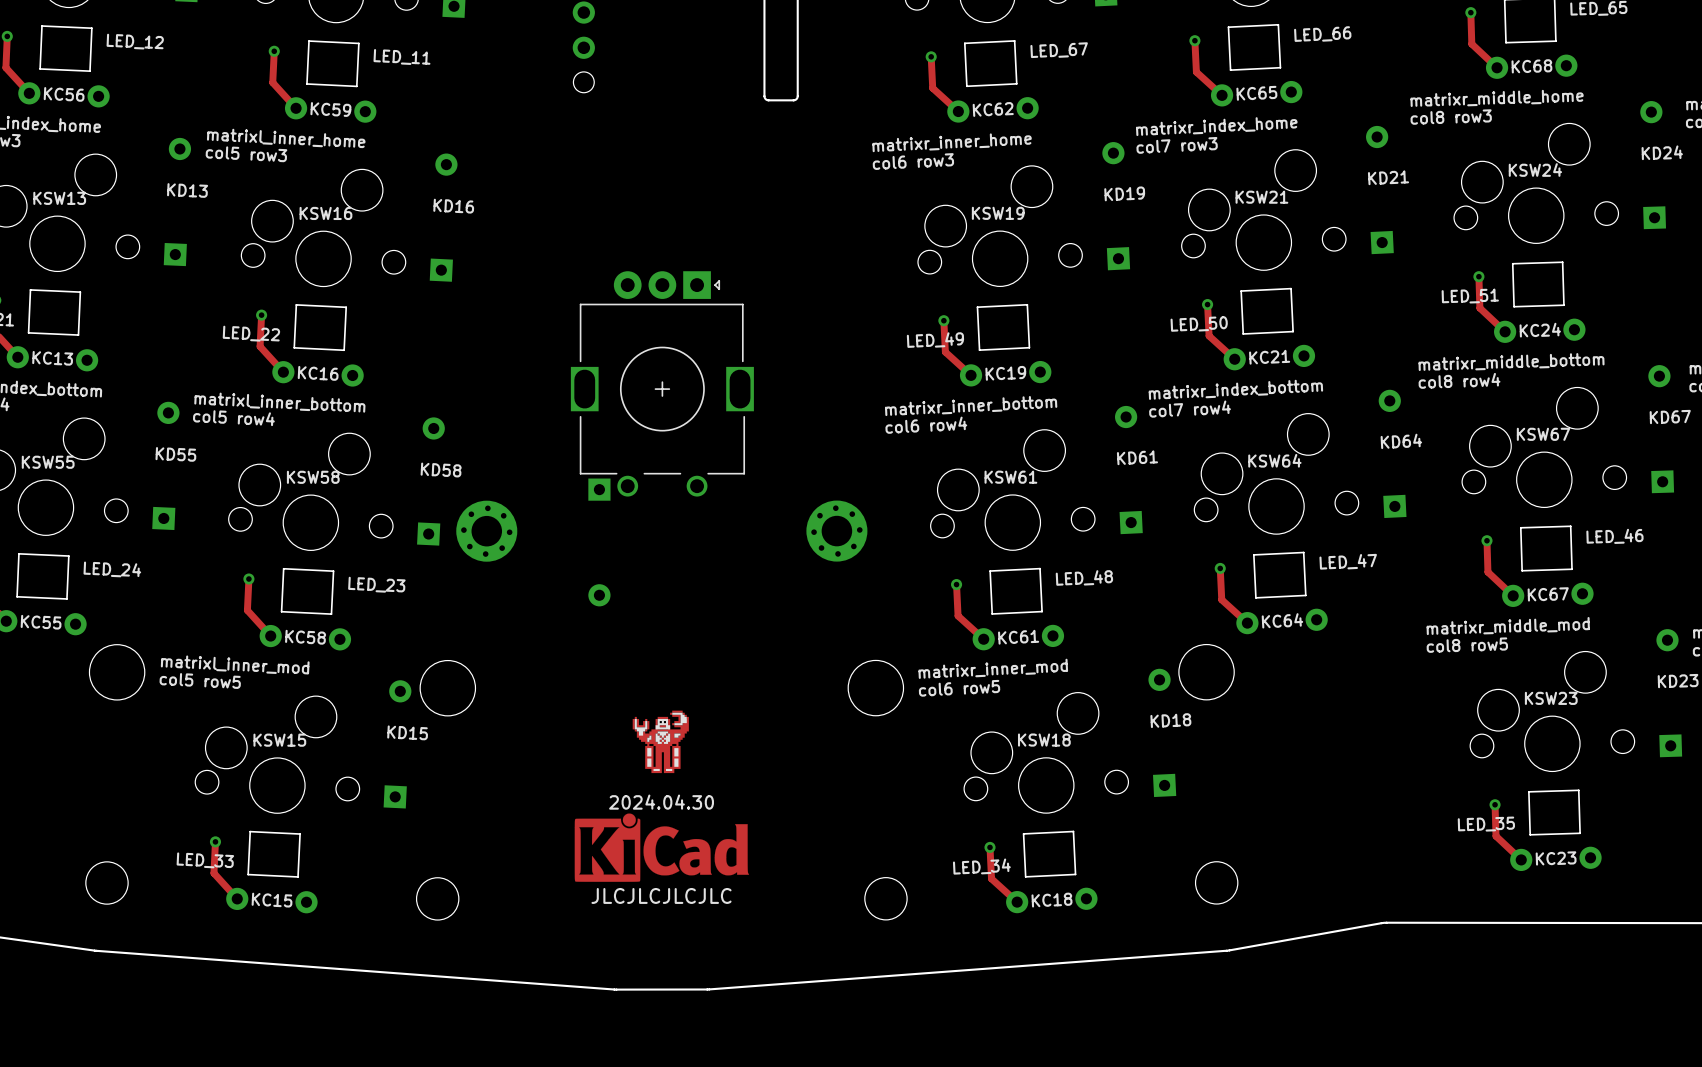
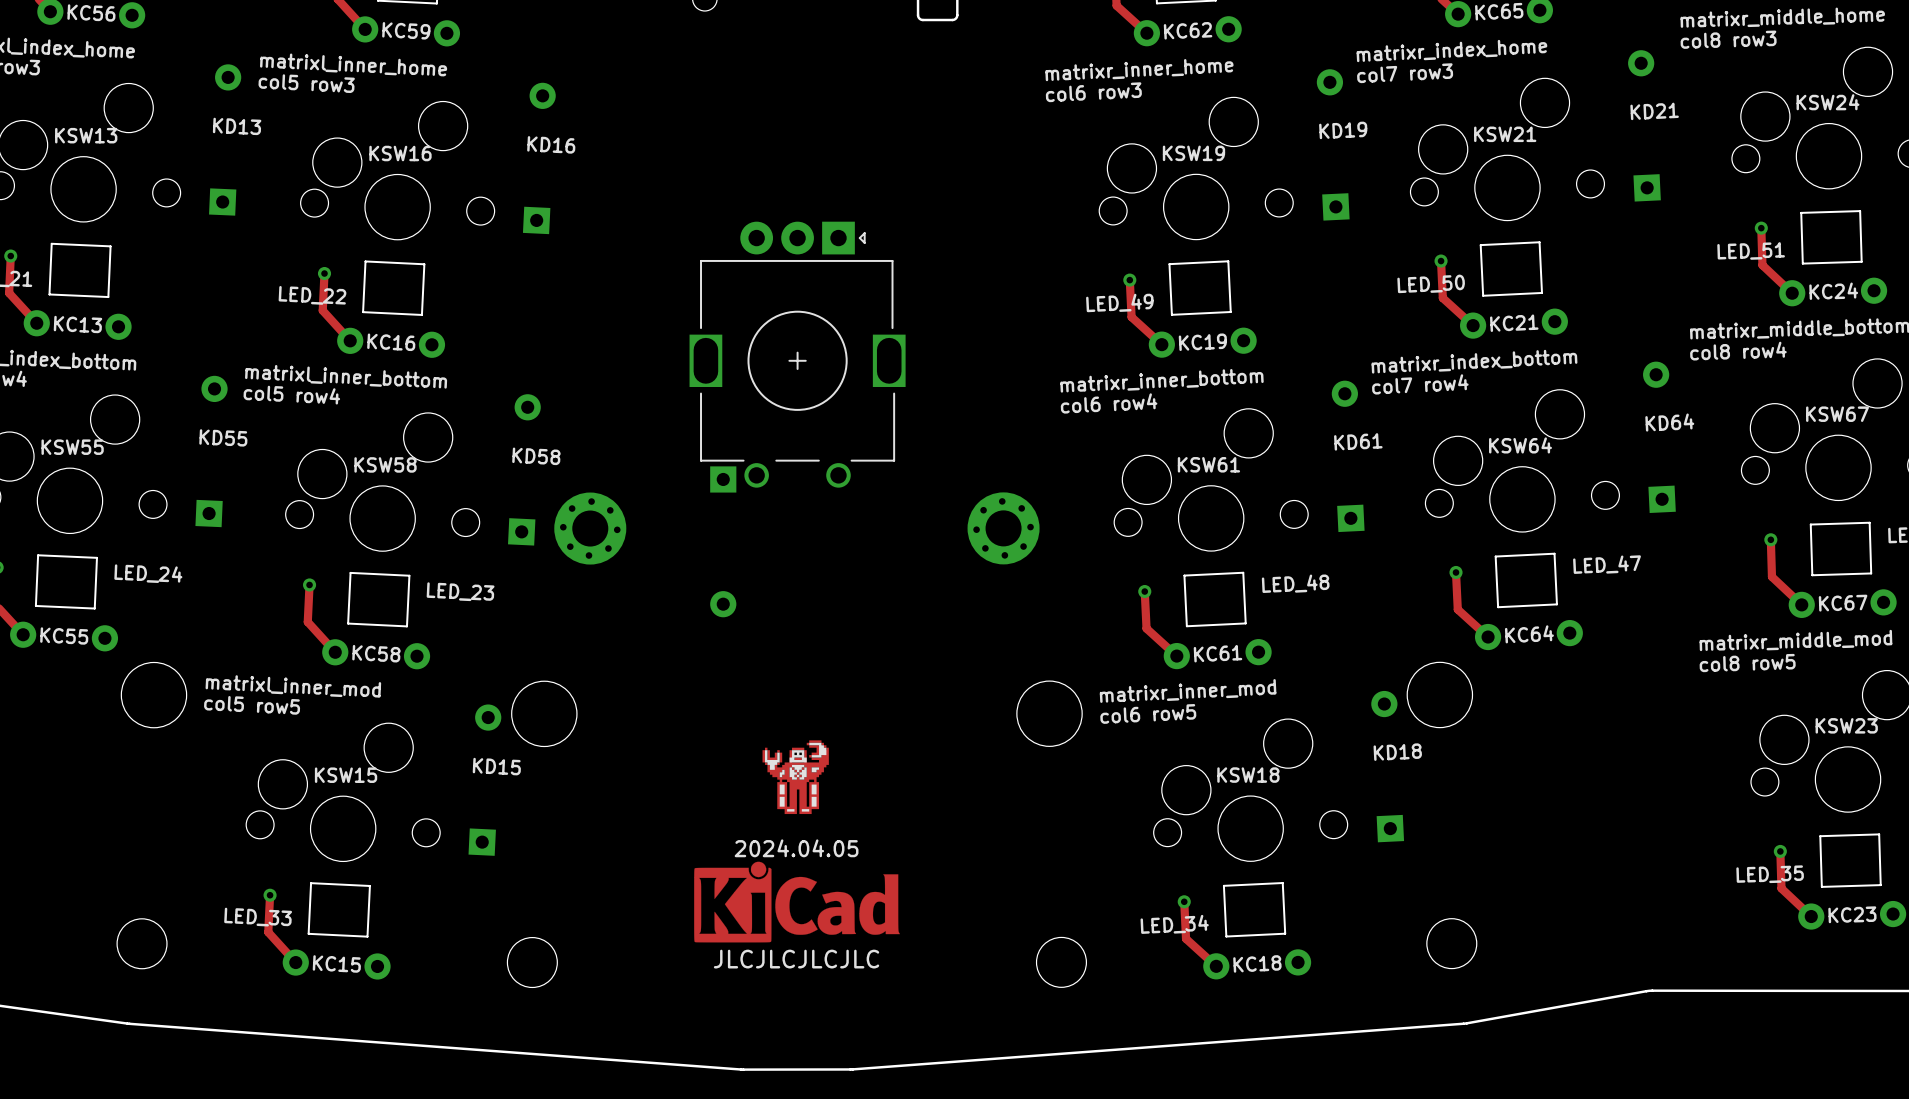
text: 2024.04.30 (661, 802) -> 2024.04.05 (796, 848)

